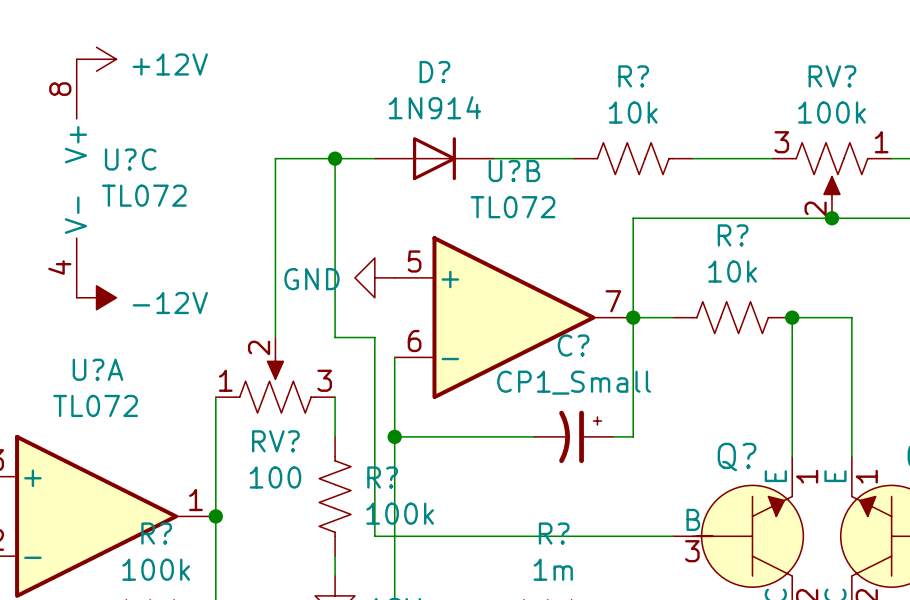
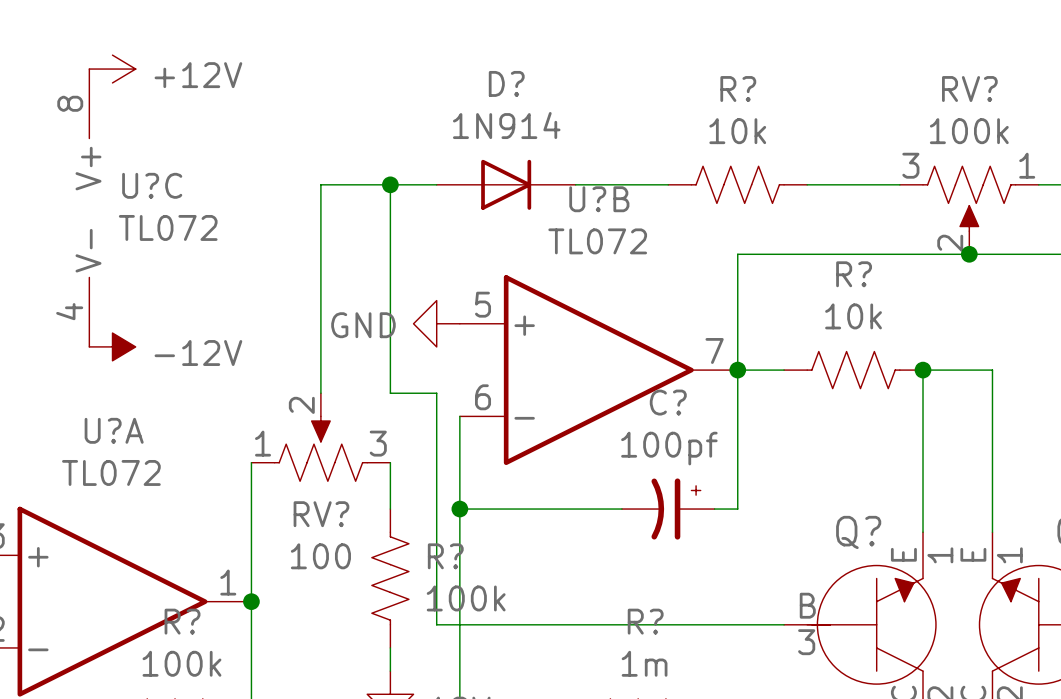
C? value: CP1_Small (574, 382) -> 100pf (669, 448)

